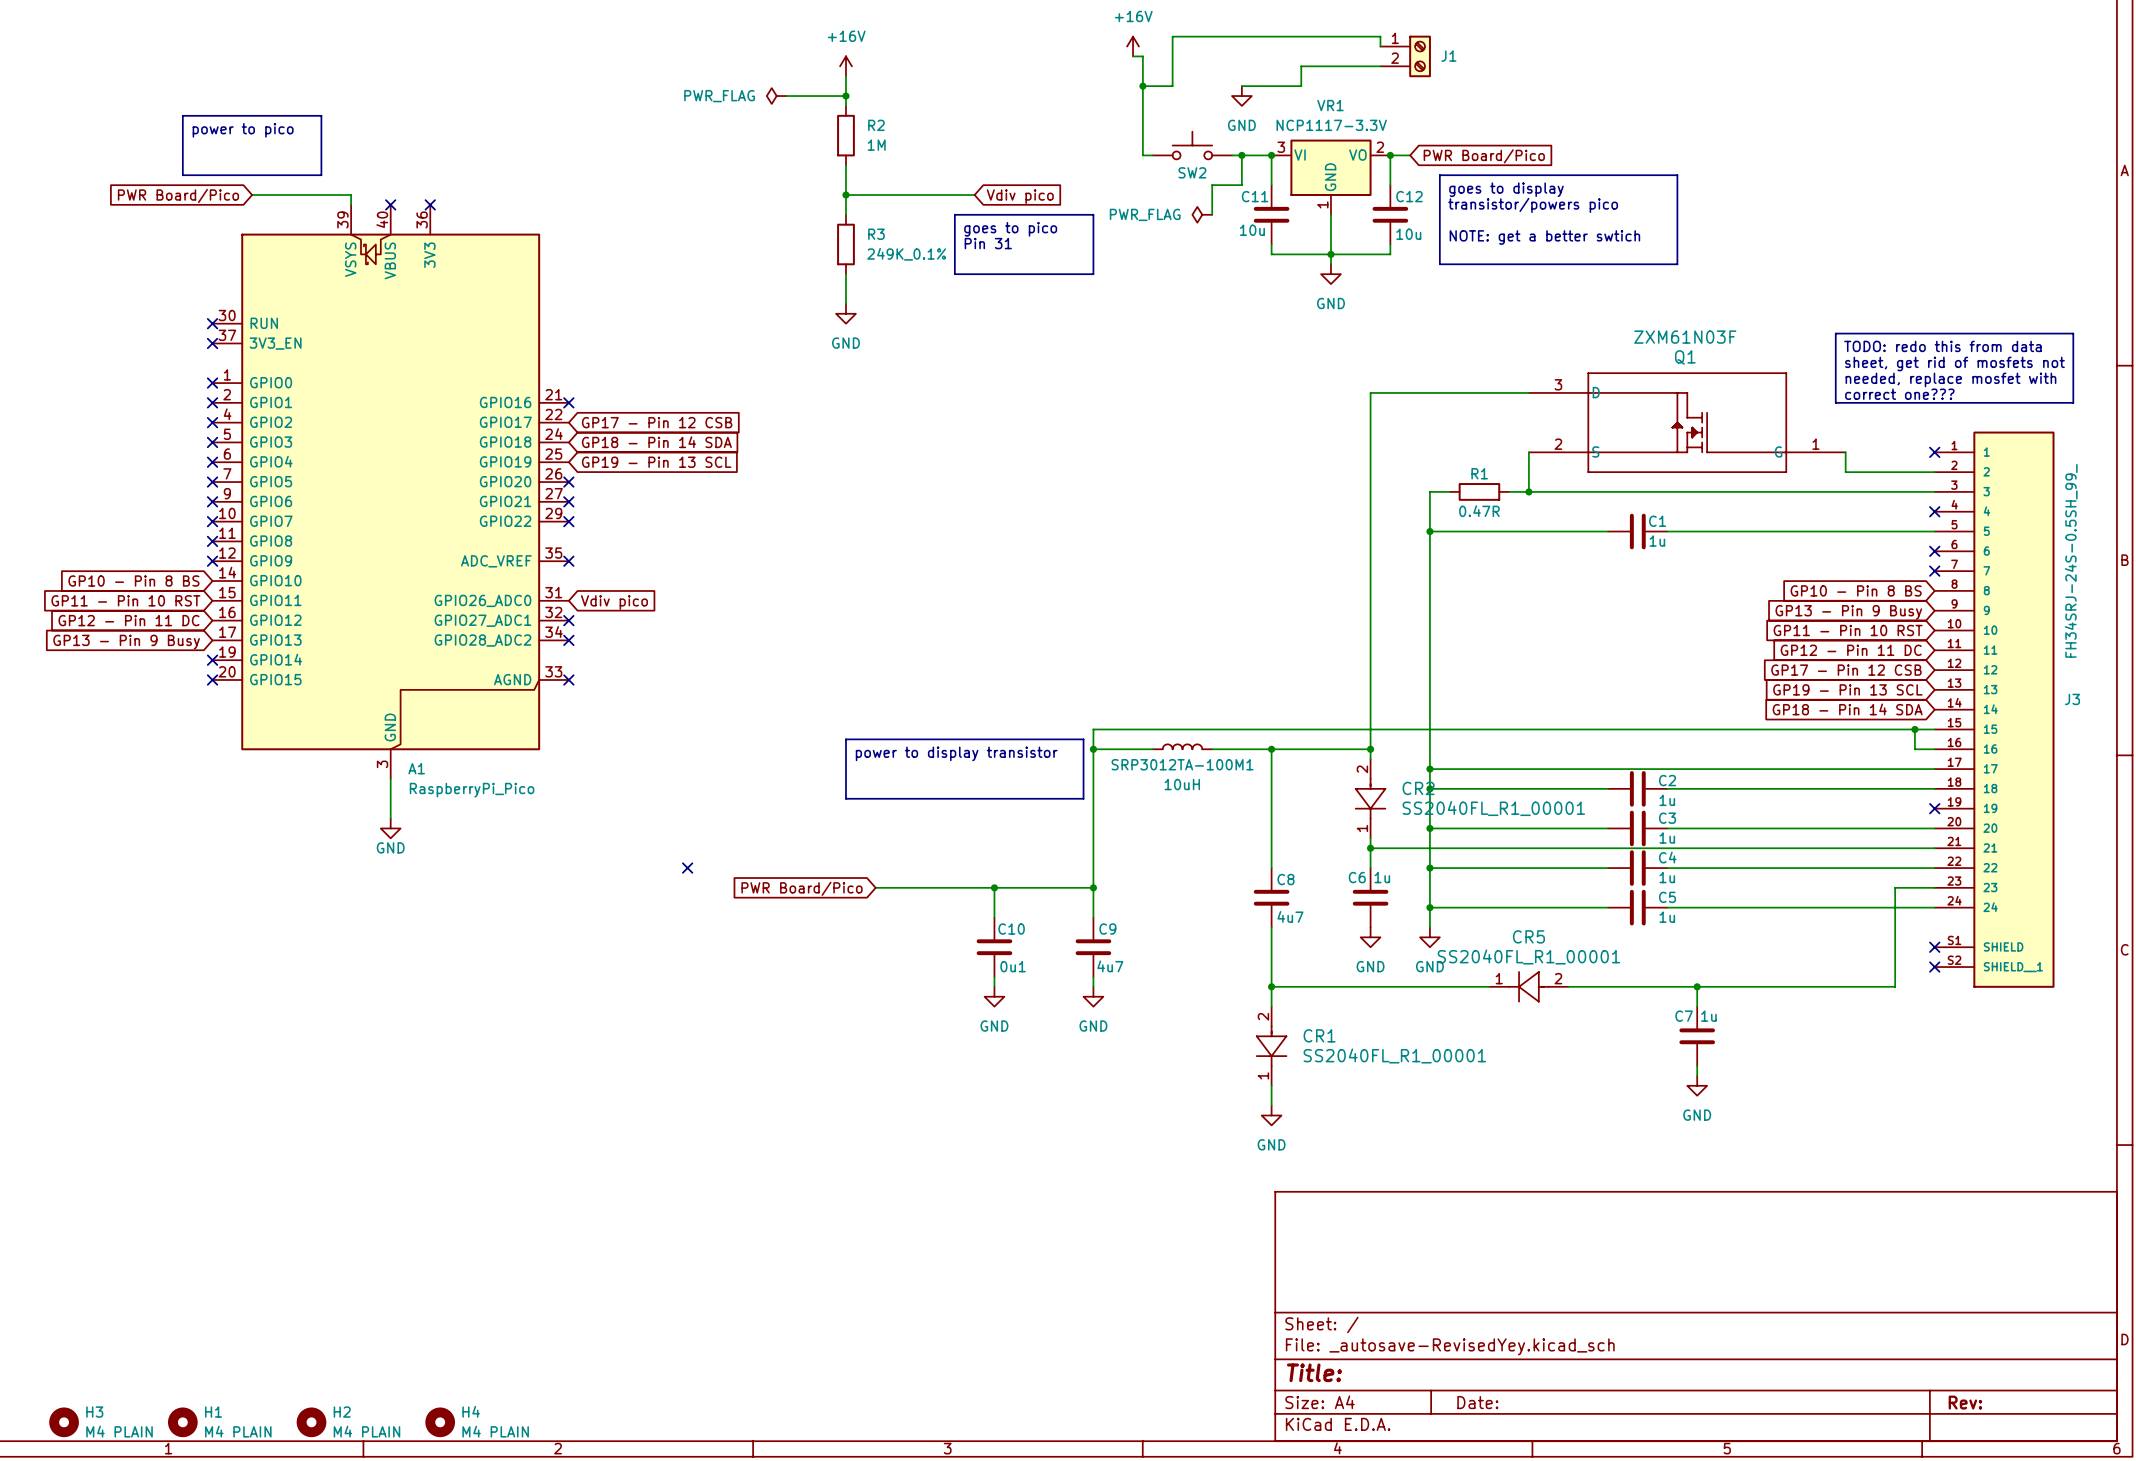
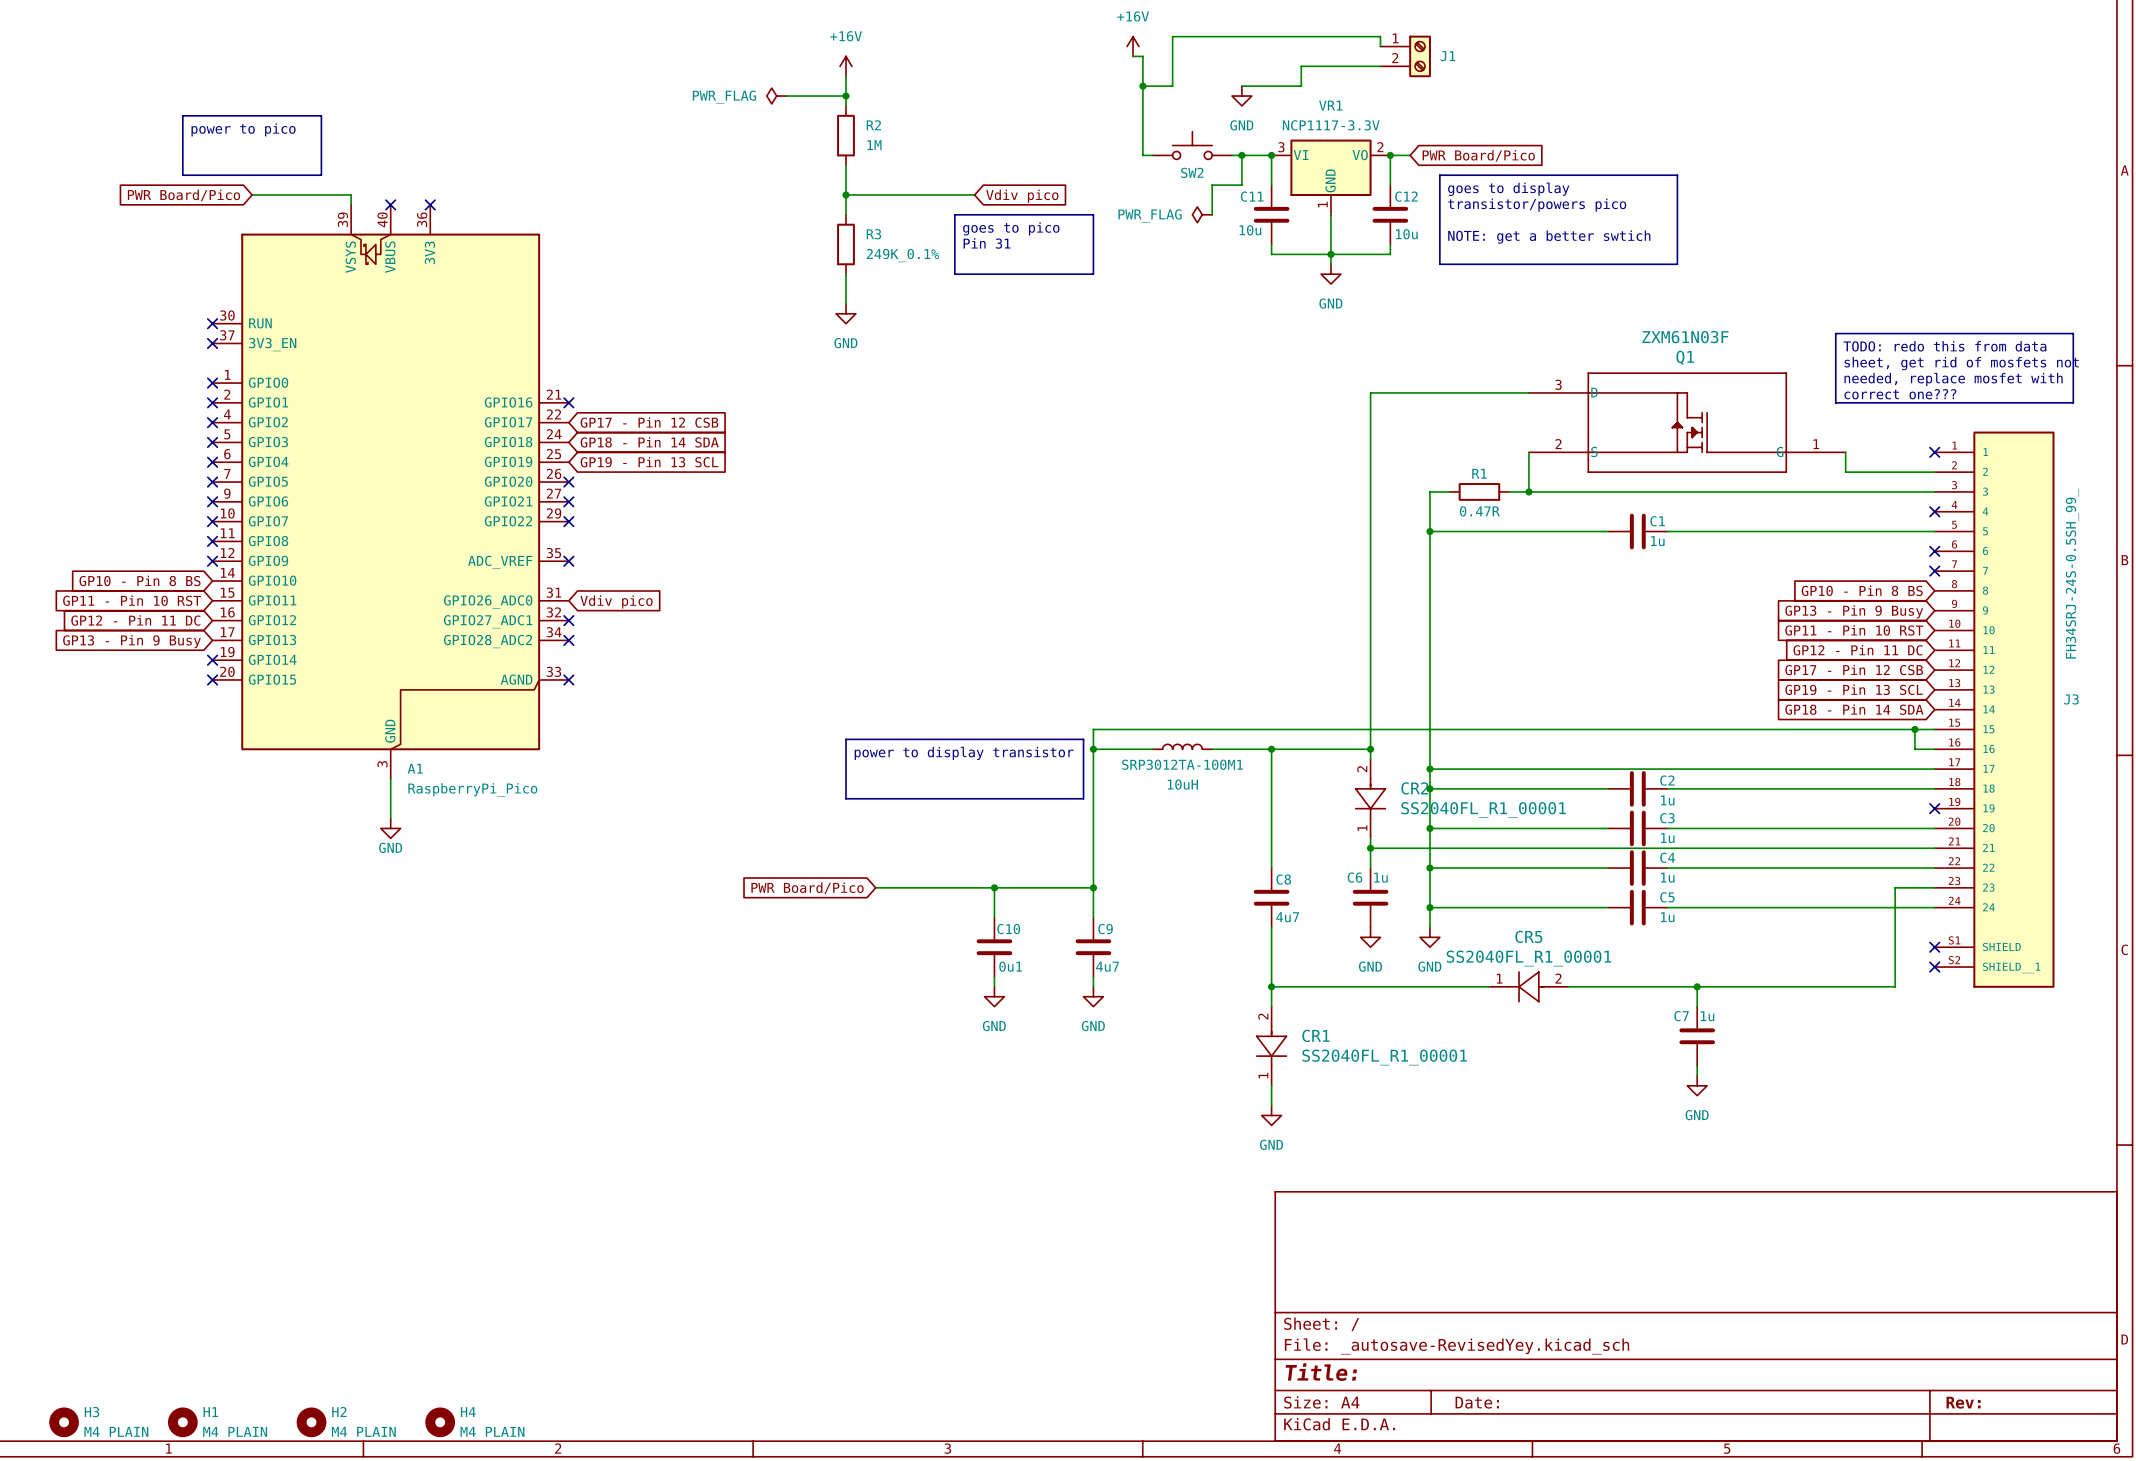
no-connect mark: (687, 868) -> none

